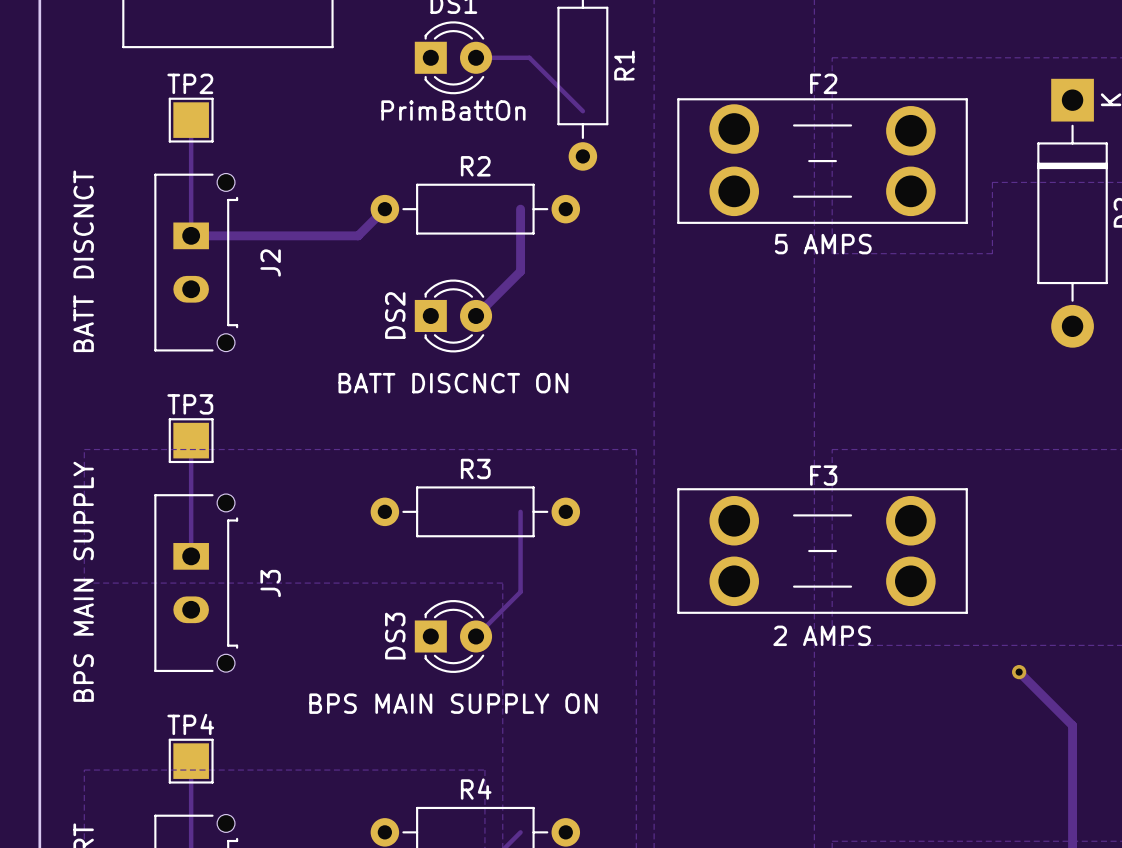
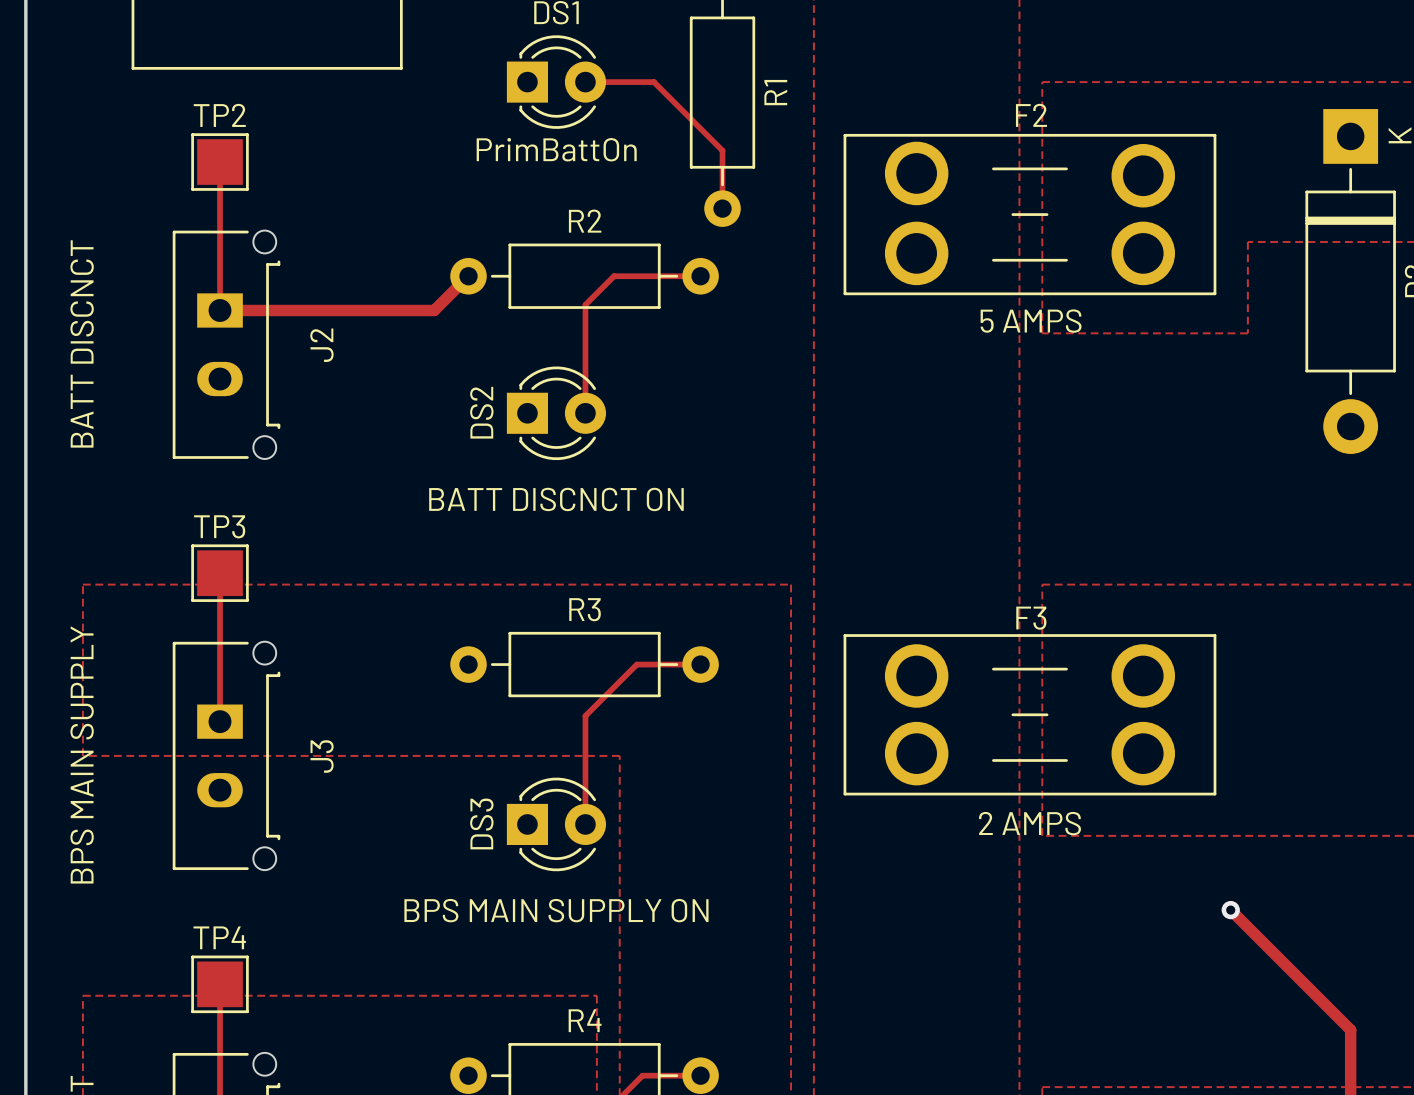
track: none -> (722, 150) (722, 208)
track: (520, 209) (520, 271) (476, 315) -> (700, 276) (614, 276) (585, 304) (585, 413)
track: (520, 511) (520, 591) (476, 636) -> (700, 664) (636, 664) (585, 715) (585, 824)
track: (1019, 672) (1072, 725) (1072, 796) -> (1230, 910) (1350, 1030)
via position: (1019, 672) -> (1230, 910)
track: none -> (642, 1075) (700, 1075)

